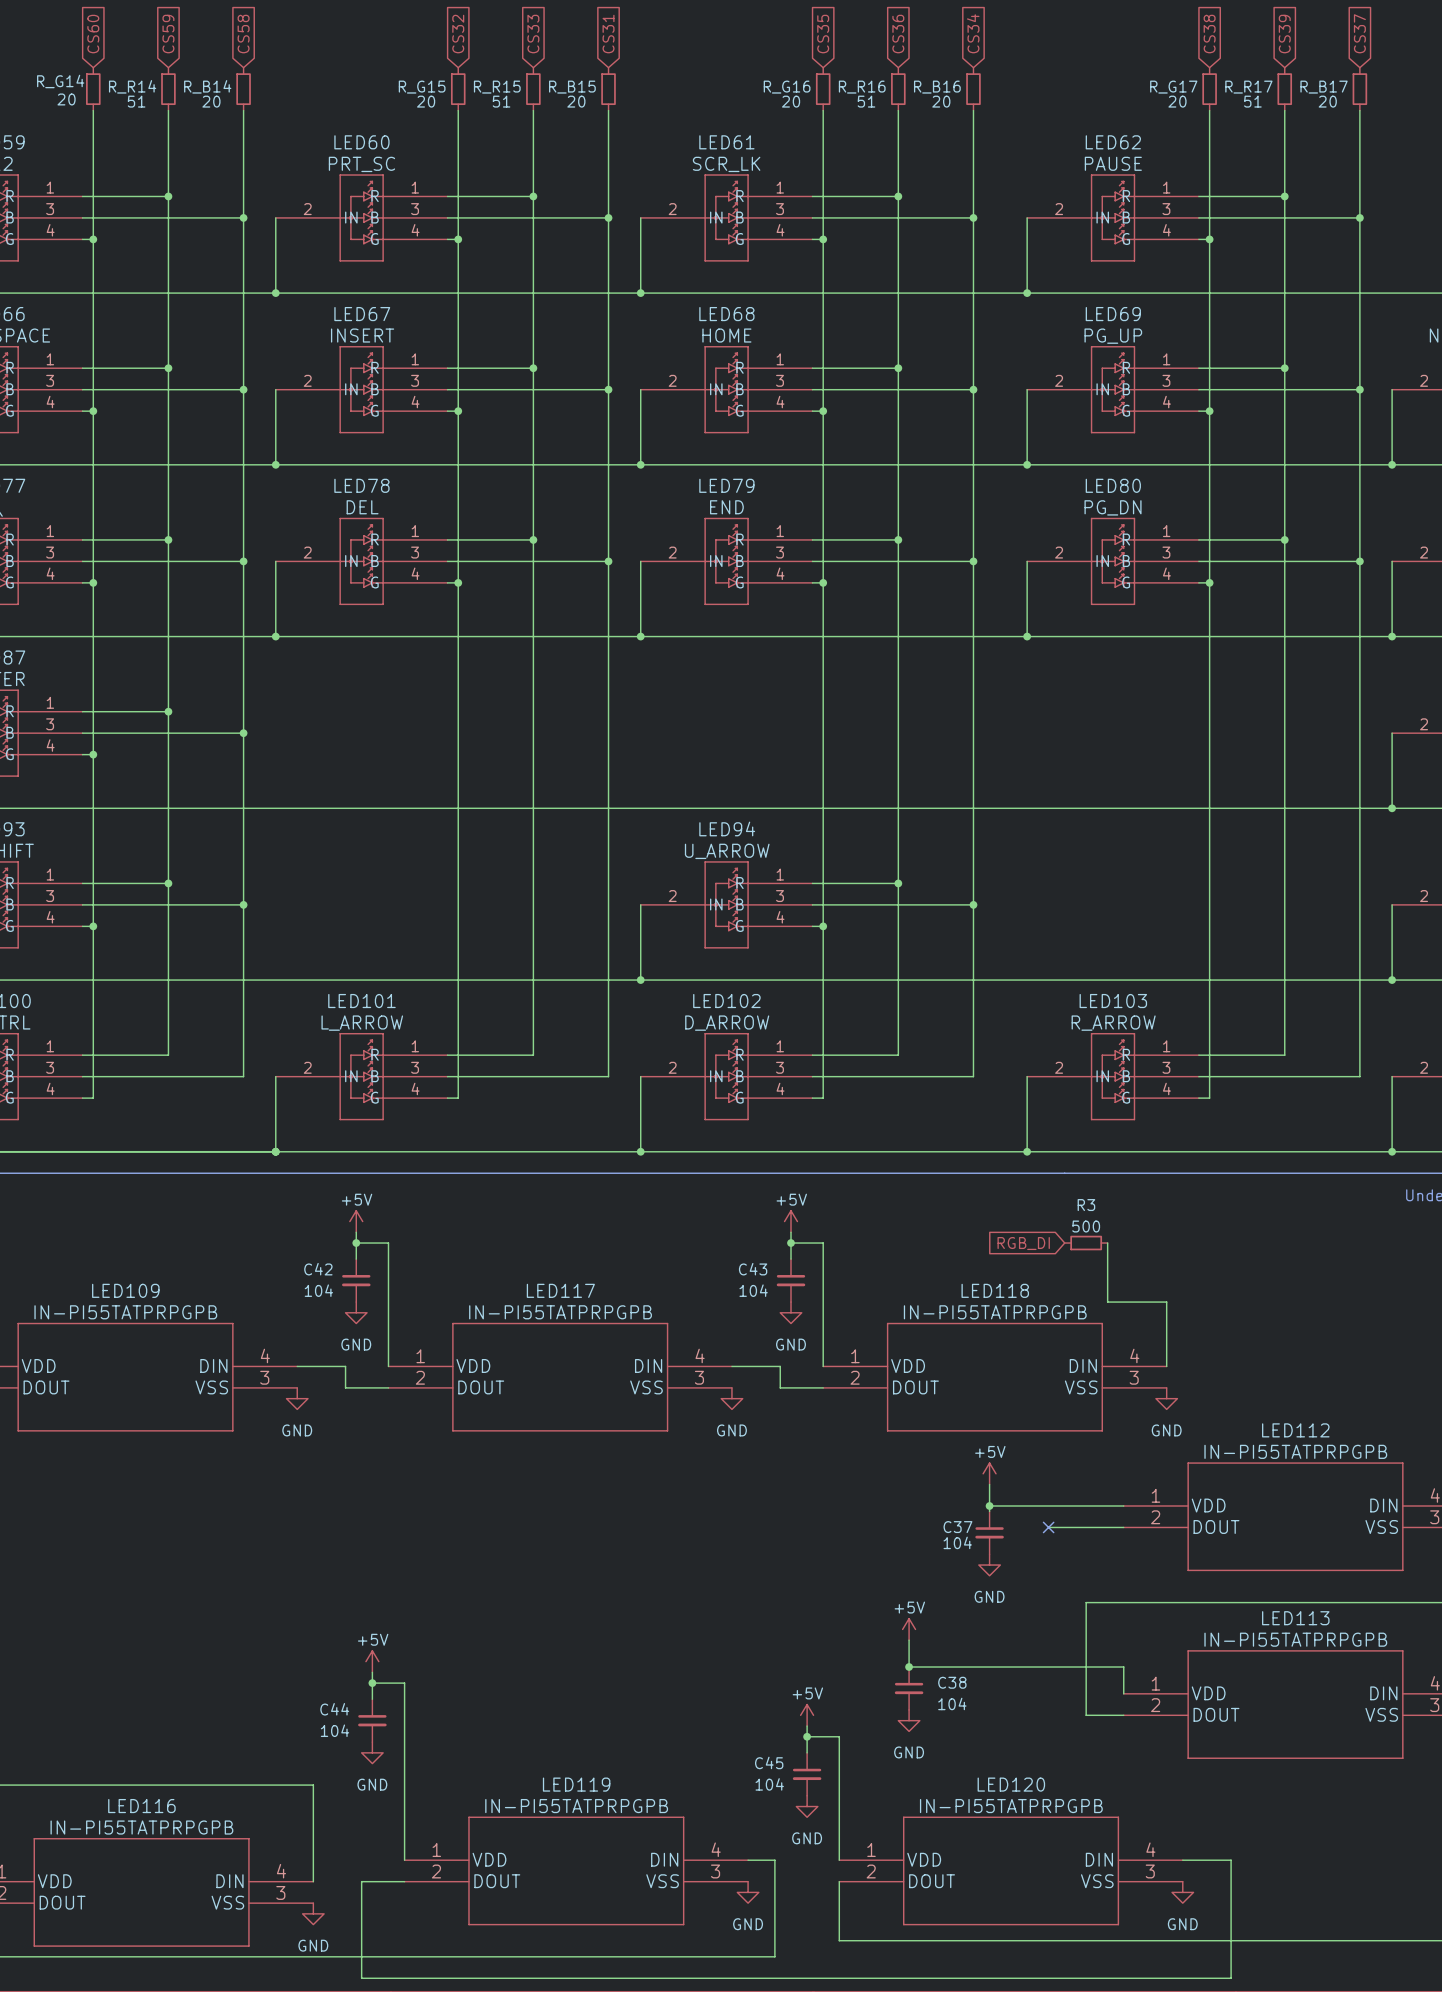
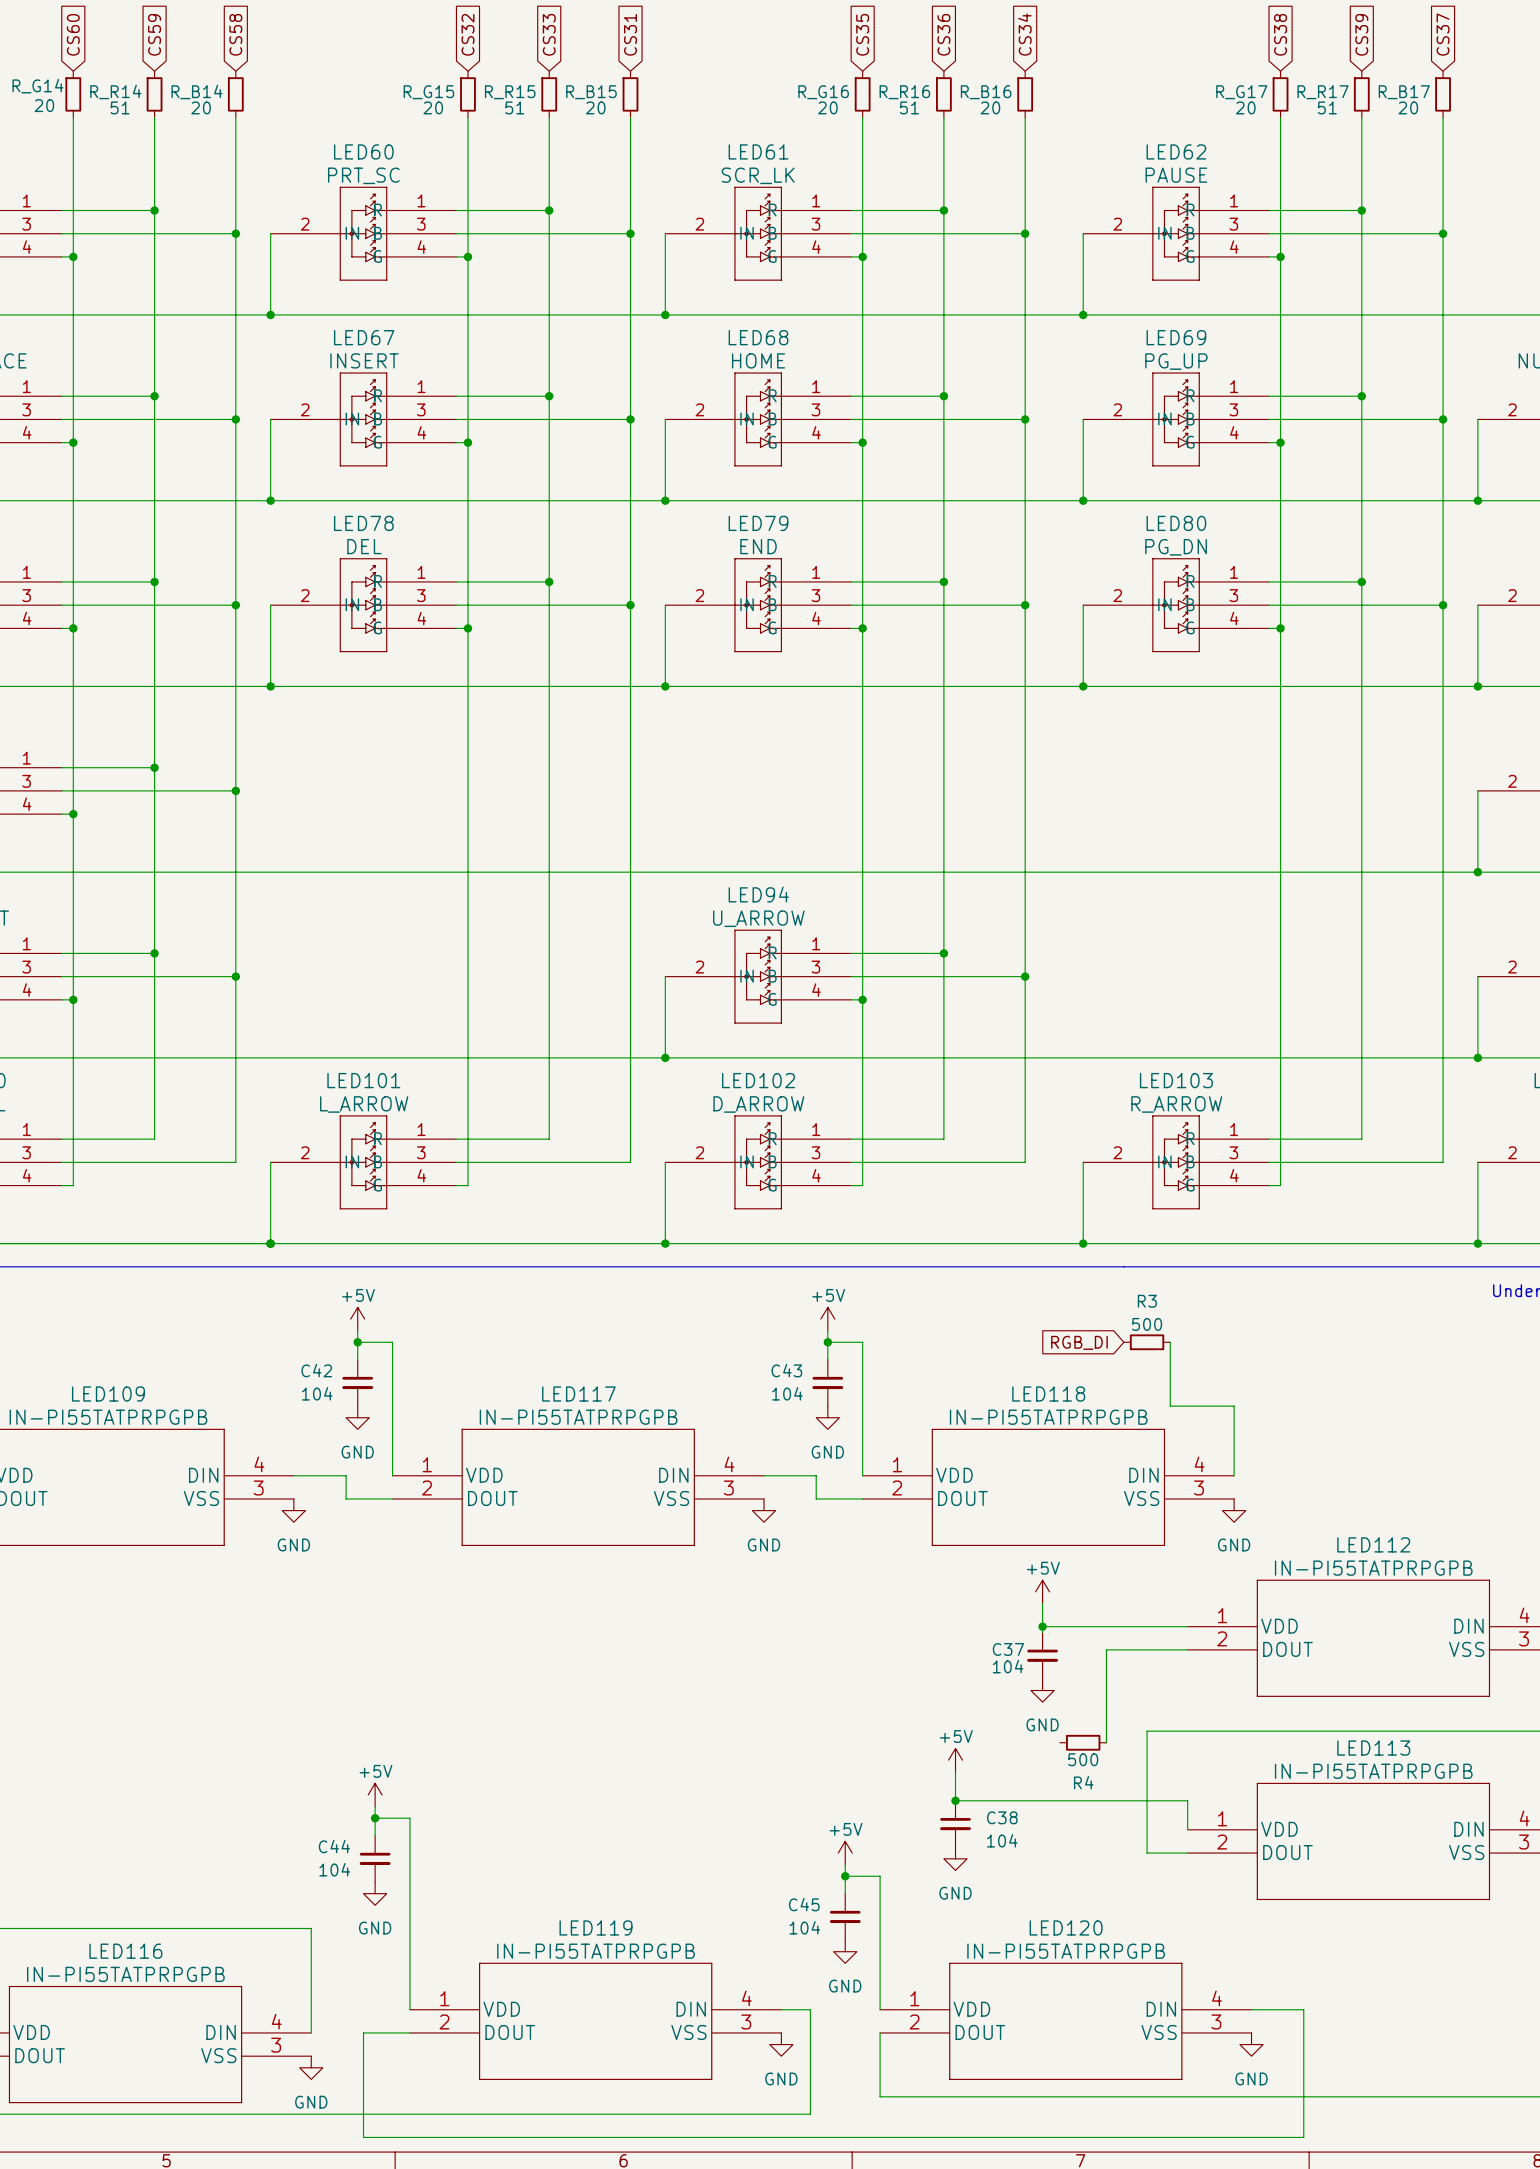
wire: none -> (1106, 1649) (1106, 1742)
no-connect mark: (1048, 1527) -> none
R4: none -> 500 (1083, 1742)

